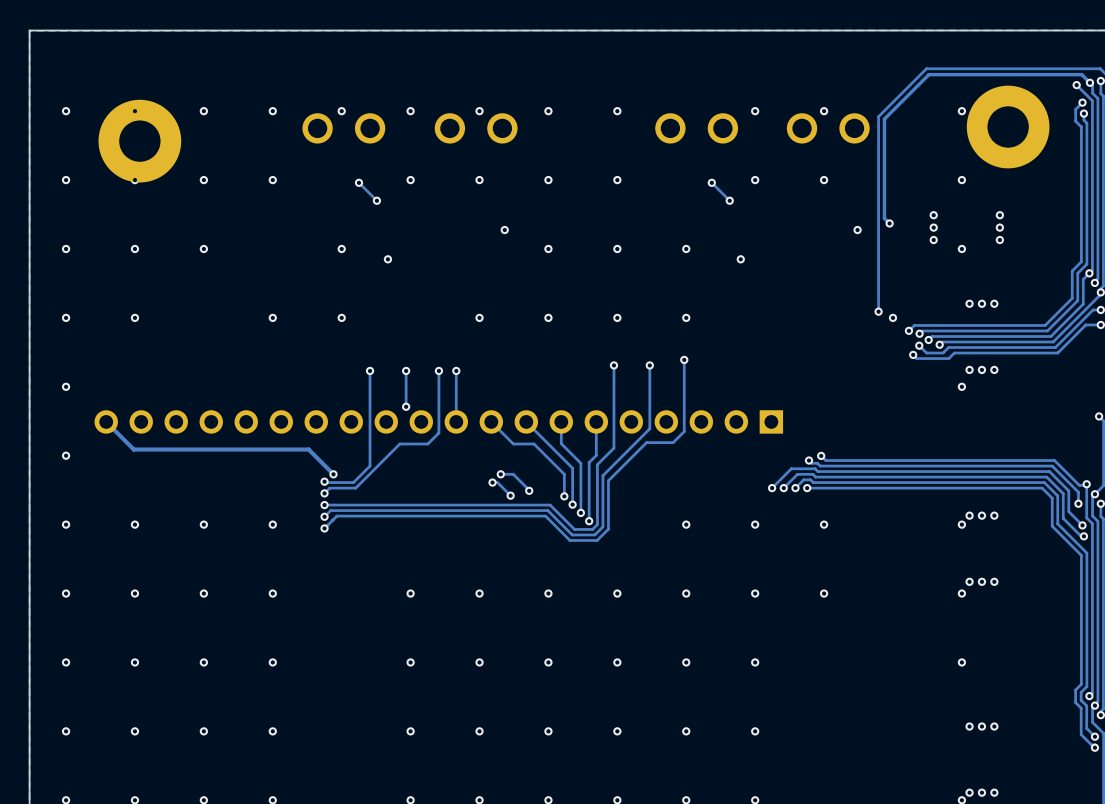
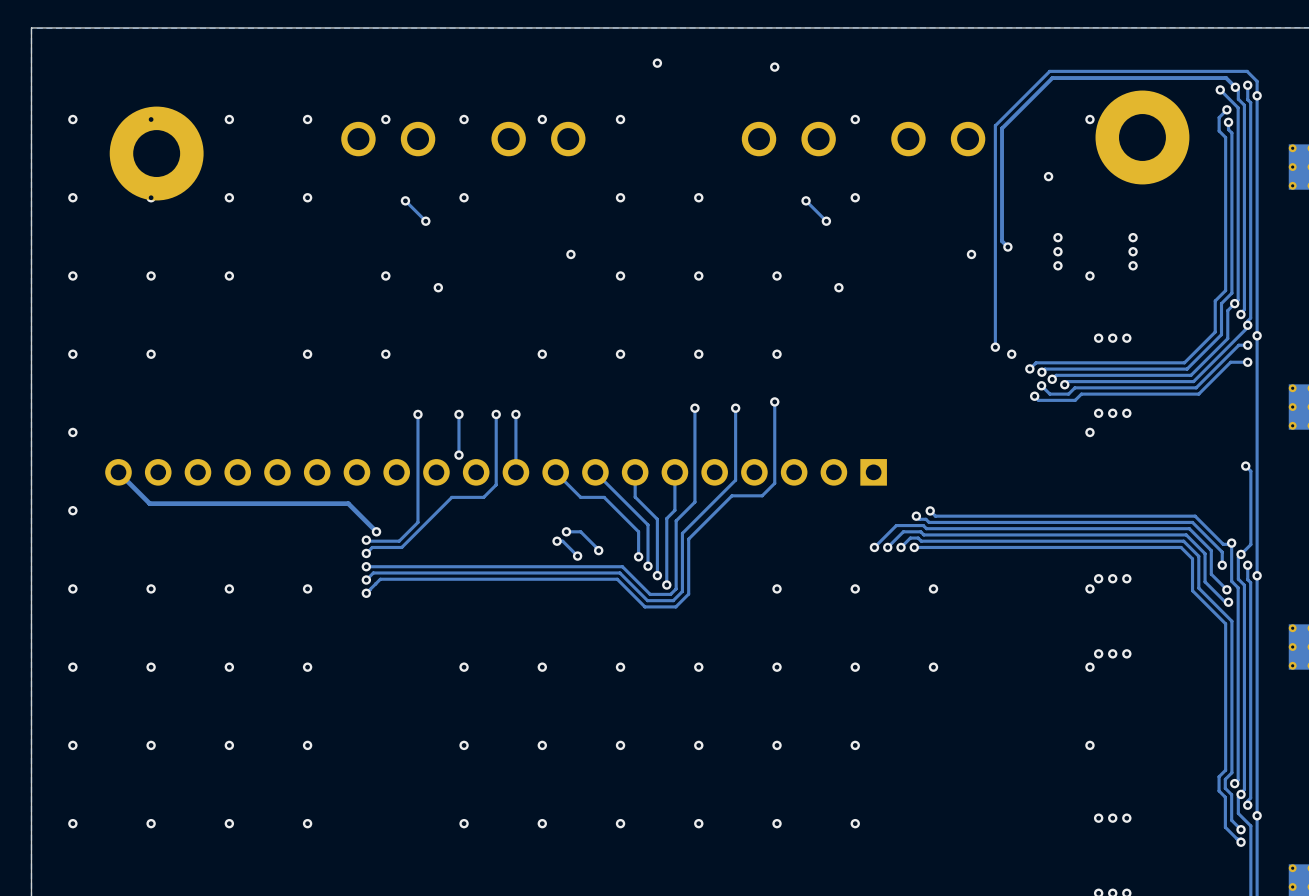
via: none -> (657, 63)
via: none -> (774, 67)
via: (617, 111) -> none
via: (824, 111) -> none
via: (479, 180) -> none
via: (824, 180) -> none
via position: (961, 180) -> (1048, 176)

